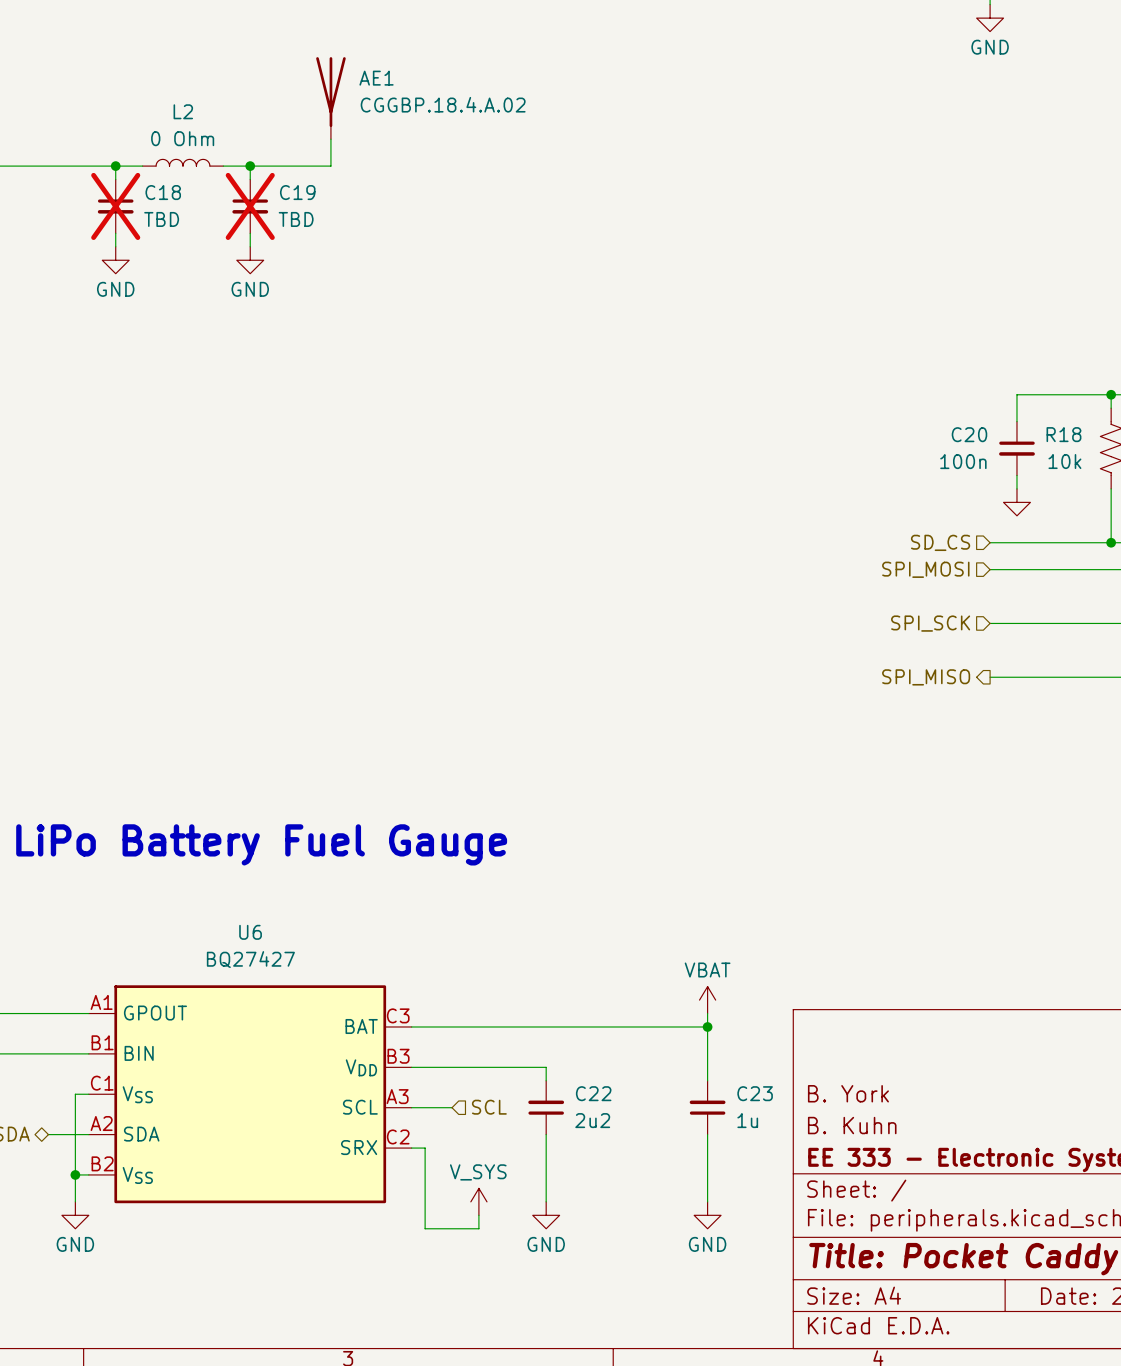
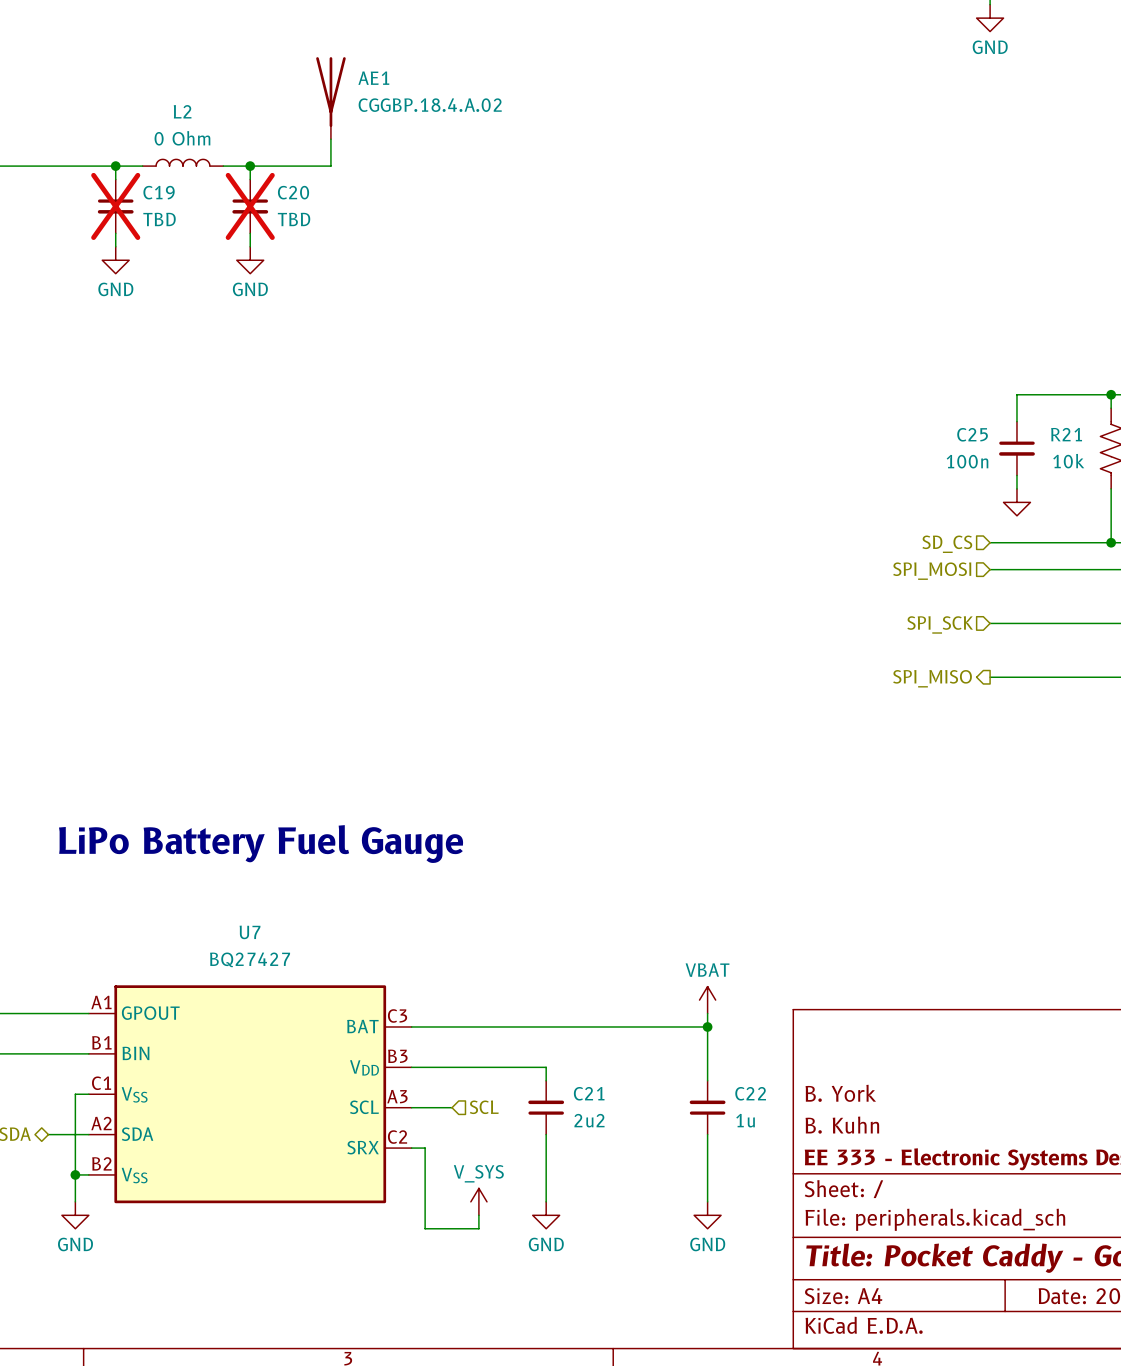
C18 name: C18 (163, 192) -> C19 (159, 192)
C19 name: C19 (297, 192) -> C20 (293, 192)
C20 name: C20 (969, 434) -> C25 (972, 434)
R18 name: R18 (1063, 434) -> R21 (1066, 434)
U6 name: U6 (250, 932) -> U7 (250, 932)
C22 name: C22 (593, 1093) -> C21 (589, 1093)
C23 name: C23 (755, 1093) -> C22 (750, 1093)

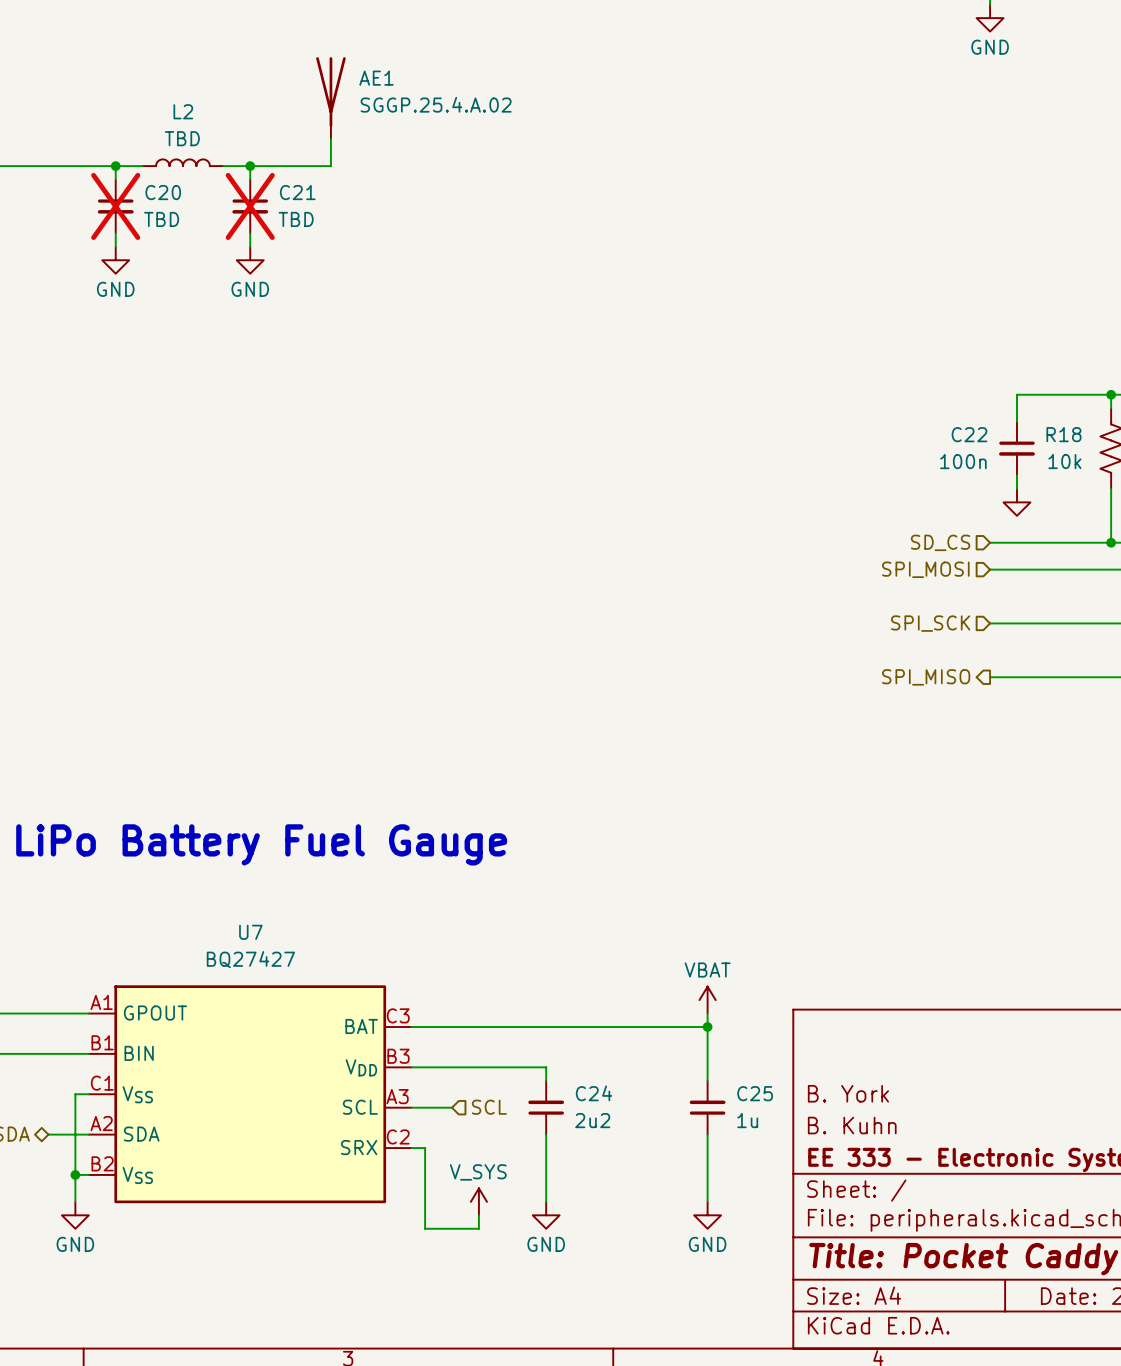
AE1 value: CGGBP.18.4.A.02 (430, 105) -> SGGP.25.4.A.02 (436, 104)
L2 value: 0 Ohm (182, 138) -> TBD (182, 138)
C19 name: C19 (159, 192) -> C20 (163, 192)
C20 name: C20 (293, 192) -> C21 (297, 192)
C25 name: C25 (972, 434) -> C22 (969, 434)
R21 name: R21 (1066, 434) -> R18 (1063, 434)
C21 name: C21 (589, 1093) -> C24 (594, 1093)
C22 name: C22 (750, 1093) -> C25 (755, 1093)

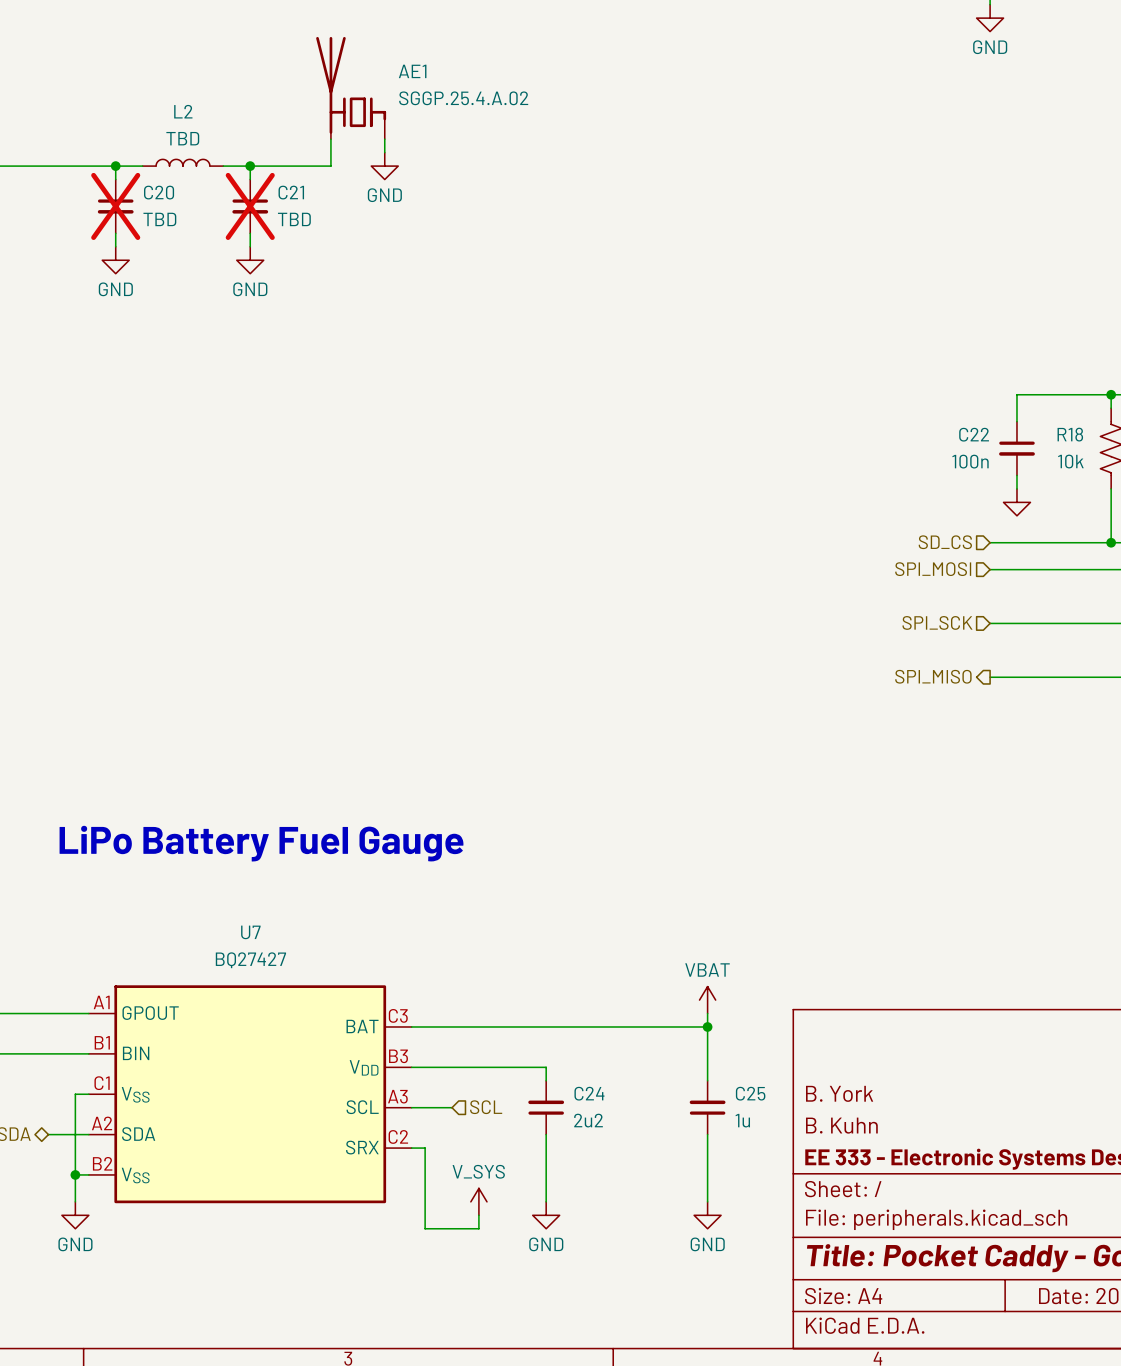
AE1 symbol: [316, 57, 346, 140] -> [316, 36, 387, 140]
wire: none -> (384, 139) (384, 152)
power symbol: none -> GND (384, 166)

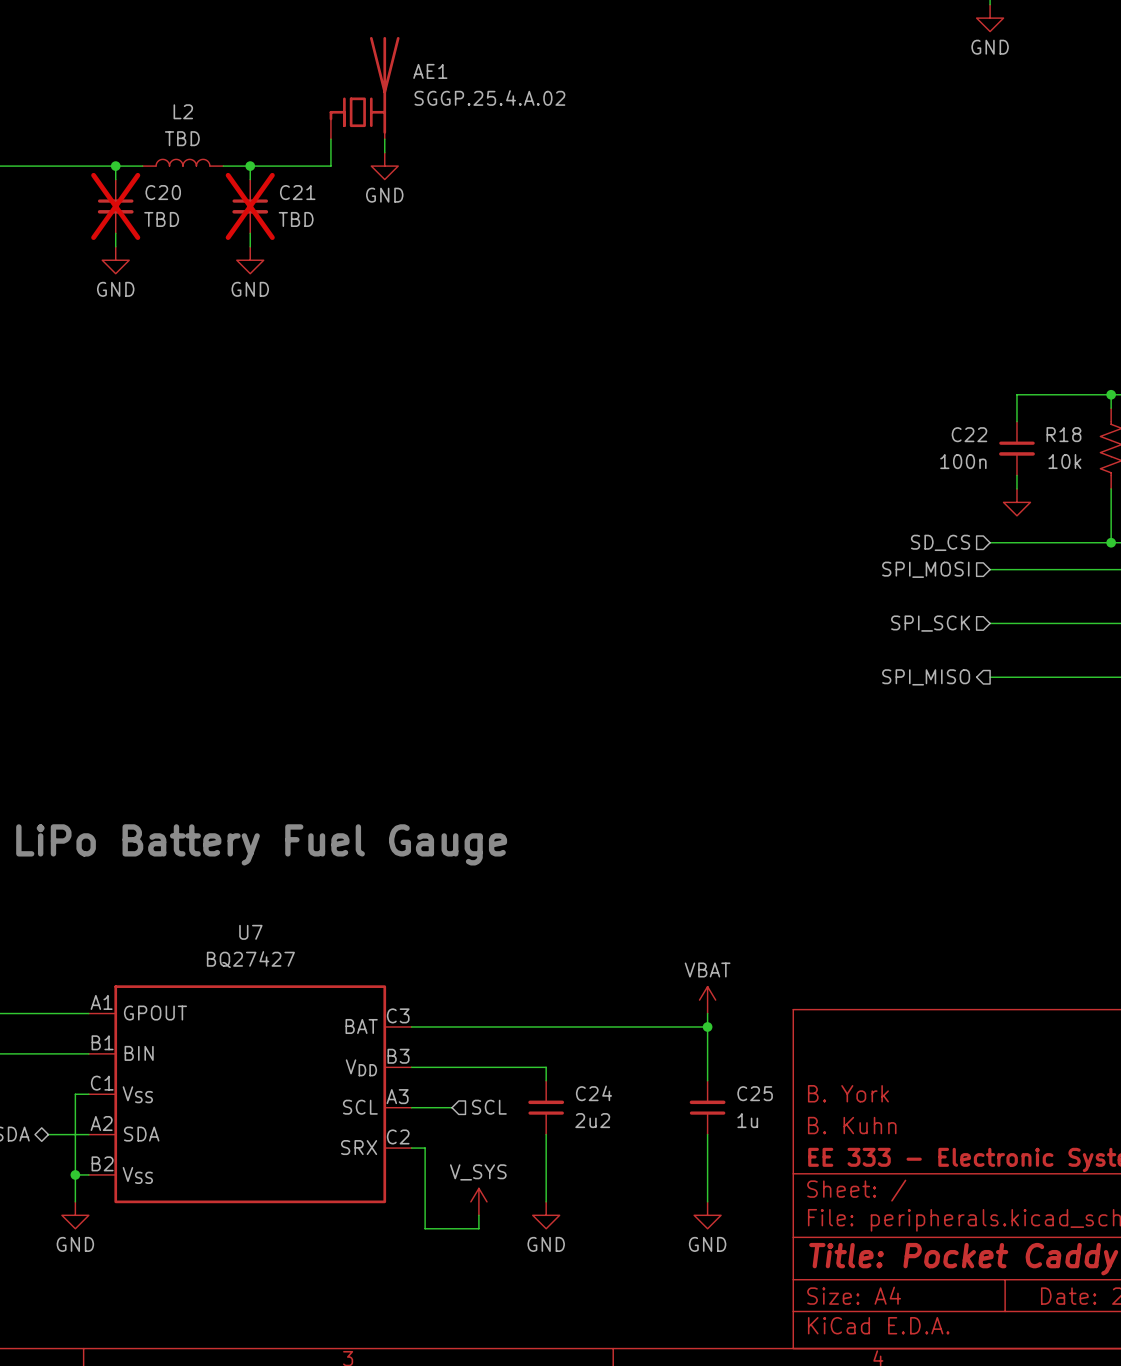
AE1 flip: as is (351, 85) -> left-right (364, 85)

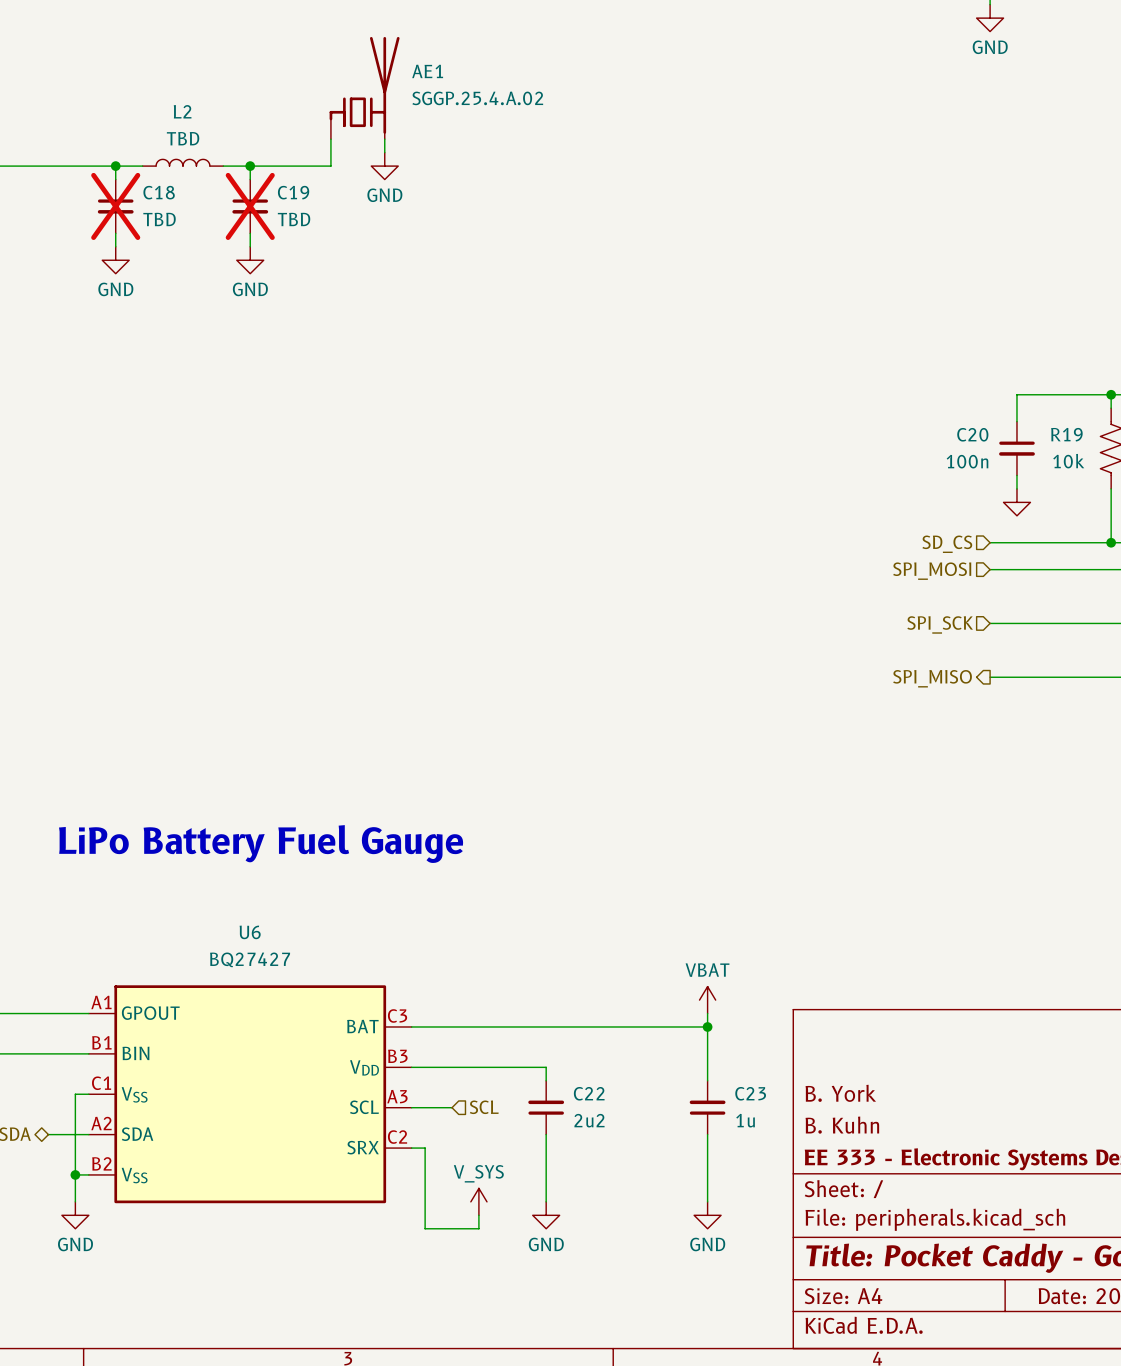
C20 name: C20 (163, 192) -> C18 (159, 192)
C21 name: C21 (297, 192) -> C19 (293, 192)
C22 name: C22 (969, 434) -> C20 (972, 434)
R18 name: R18 (1063, 434) -> R19 (1066, 434)
U7 name: U7 (250, 932) -> U6 (250, 932)
C24 name: C24 (594, 1093) -> C22 (589, 1093)
C25 name: C25 (755, 1093) -> C23 (750, 1093)

